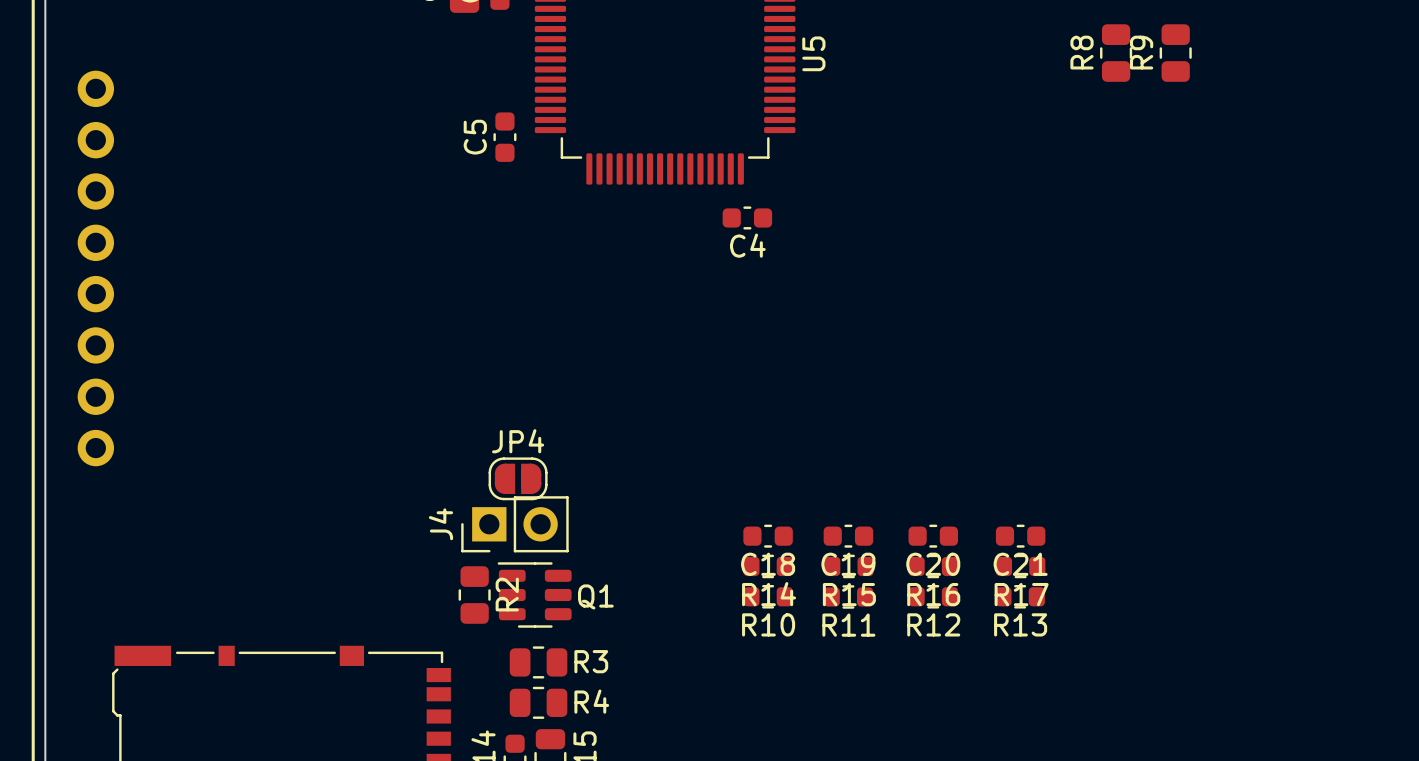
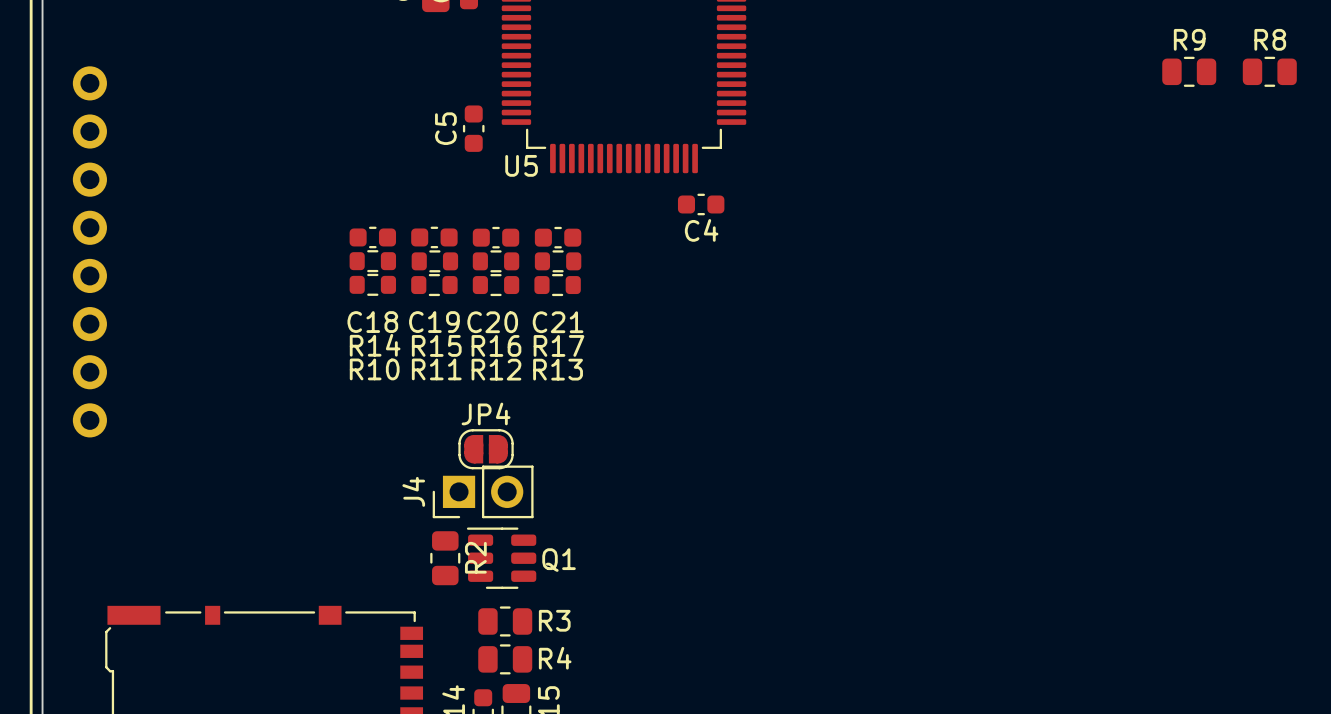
U5 name rotation: 0° (813, 53) -> 90° clockwise (521, 165)
U5 name position: U5 (813, 53) -> U5 (521, 165)
R8 rotation: 0° (1116, 53) -> 90° clockwise (1269, 71)
R8 position: (1116, 53) -> (1269, 71)
R9 rotation: 0° (1175, 53) -> 90° clockwise (1189, 71)
R9 position: (1175, 53) -> (1189, 71)
C18 position: (768, 536) -> (372, 237)
C19 position: (848, 536) -> (434, 237)
C20 position: (933, 536) -> (496, 237)
C21 position: (1020, 536) -> (558, 237)
C18 name position: C18 (768, 564) -> C18 (372, 322)
C19 name position: C19 (848, 564) -> C19 (434, 322)
C20 name position: C20 (933, 564) -> C20 (492, 322)
C21 name position: C21 (1020, 564) -> C21 (558, 322)
R14 position: (768, 566) -> (372, 261)
R15 position: (848, 566) -> (434, 261)
R16 position: (933, 566) -> (496, 261)
R17 position: (1020, 566) -> (558, 261)
R14 name position: R14 (769, 594) -> R14 (375, 345)
R15 name position: R15 (849, 594) -> R15 (436, 345)
R16 name position: R16 (933, 594) -> R16 (496, 345)
R17 name position: R17 (1021, 594) -> R17 (558, 345)
R10 position: (768, 596) -> (372, 284)
R11 position: (848, 596) -> (434, 285)
R12 position: (933, 596) -> (496, 285)
R13 position: (1020, 596) -> (557, 285)
R10 name position: R10 (768, 624) -> R10 (374, 369)
R12 name position: R12 (933, 624) -> R12 (496, 369)
R13 name position: R13 (1020, 624) -> R13 (558, 369)
R11 name position: R11 (848, 625) -> R11 (436, 369)

